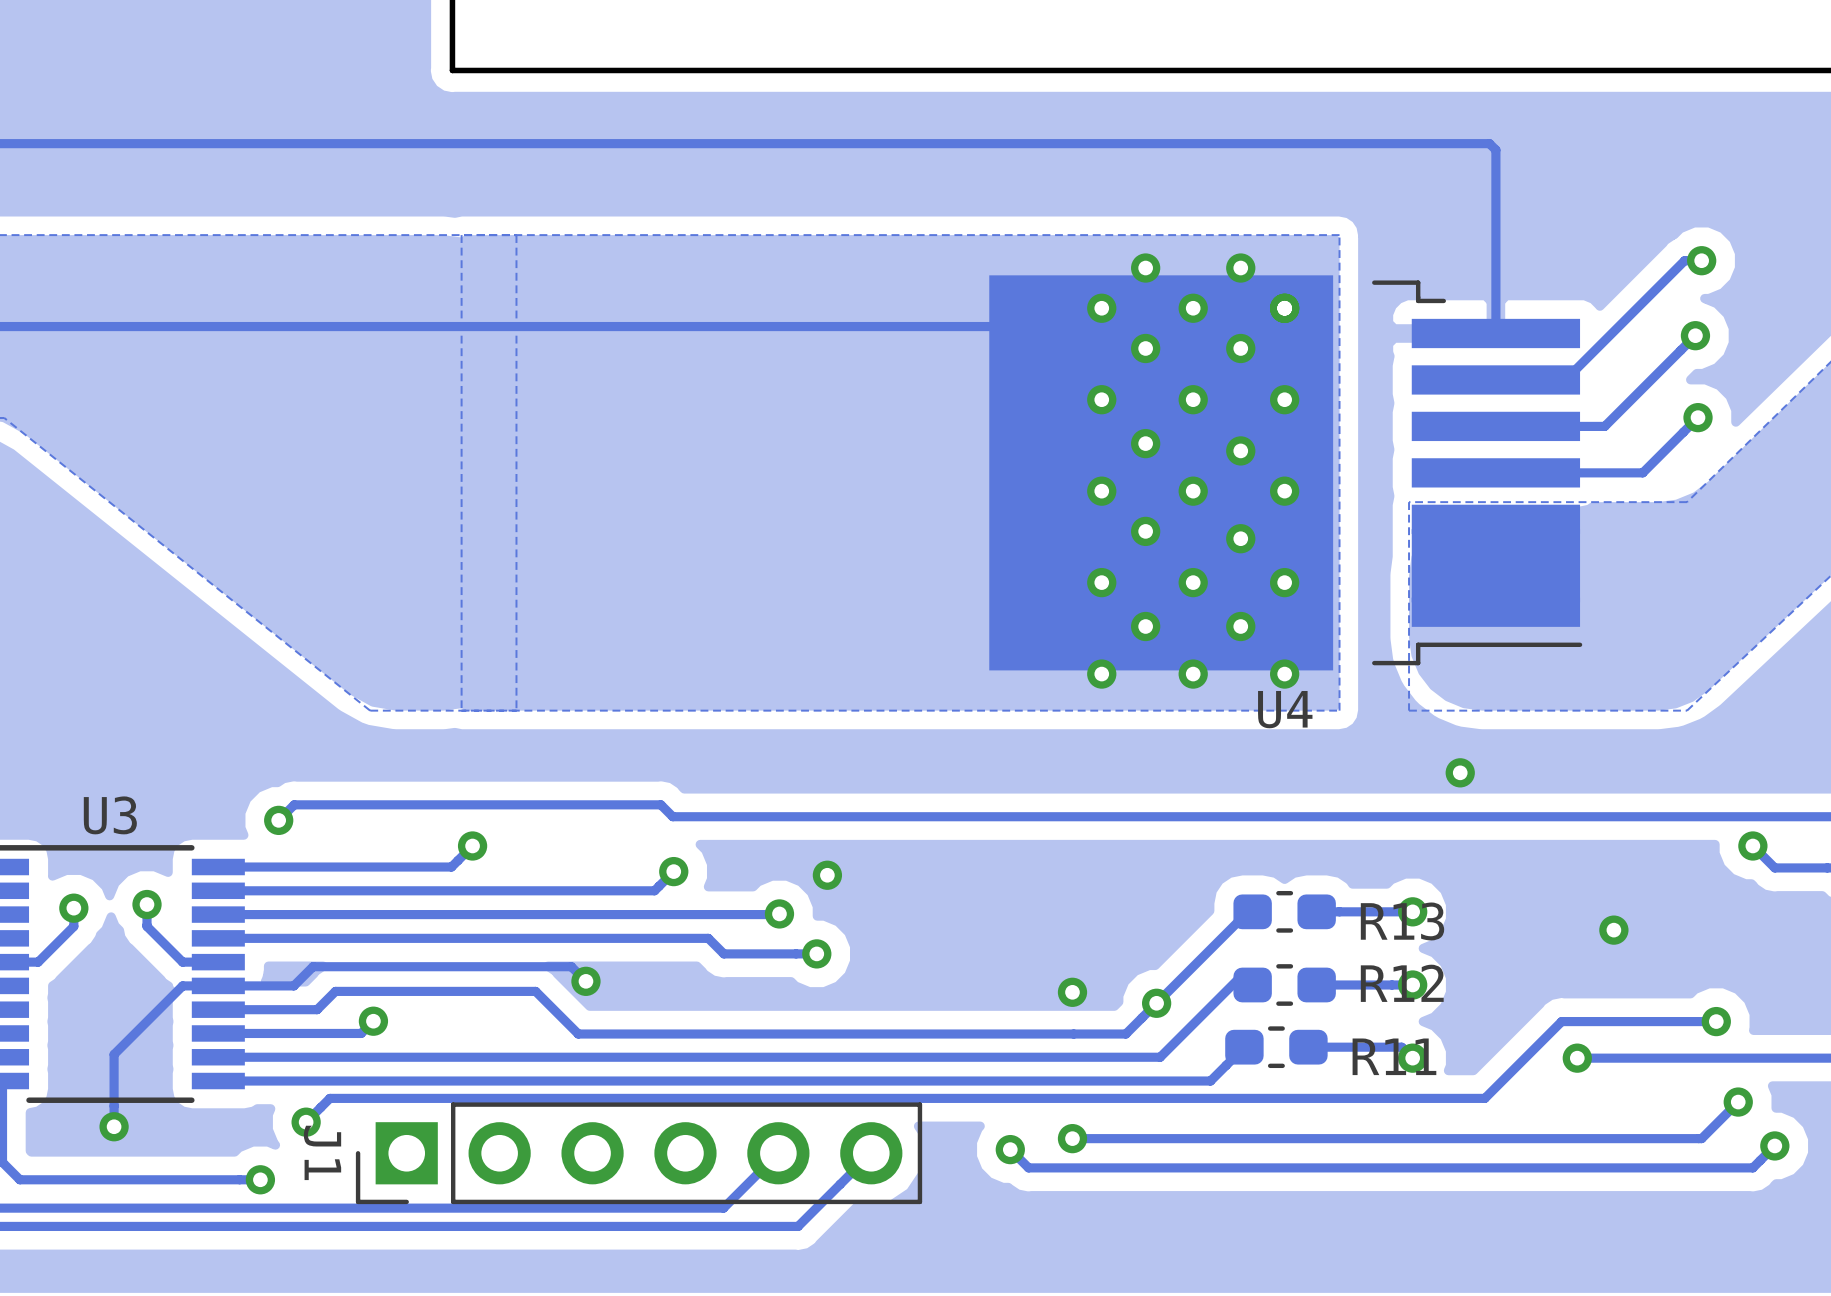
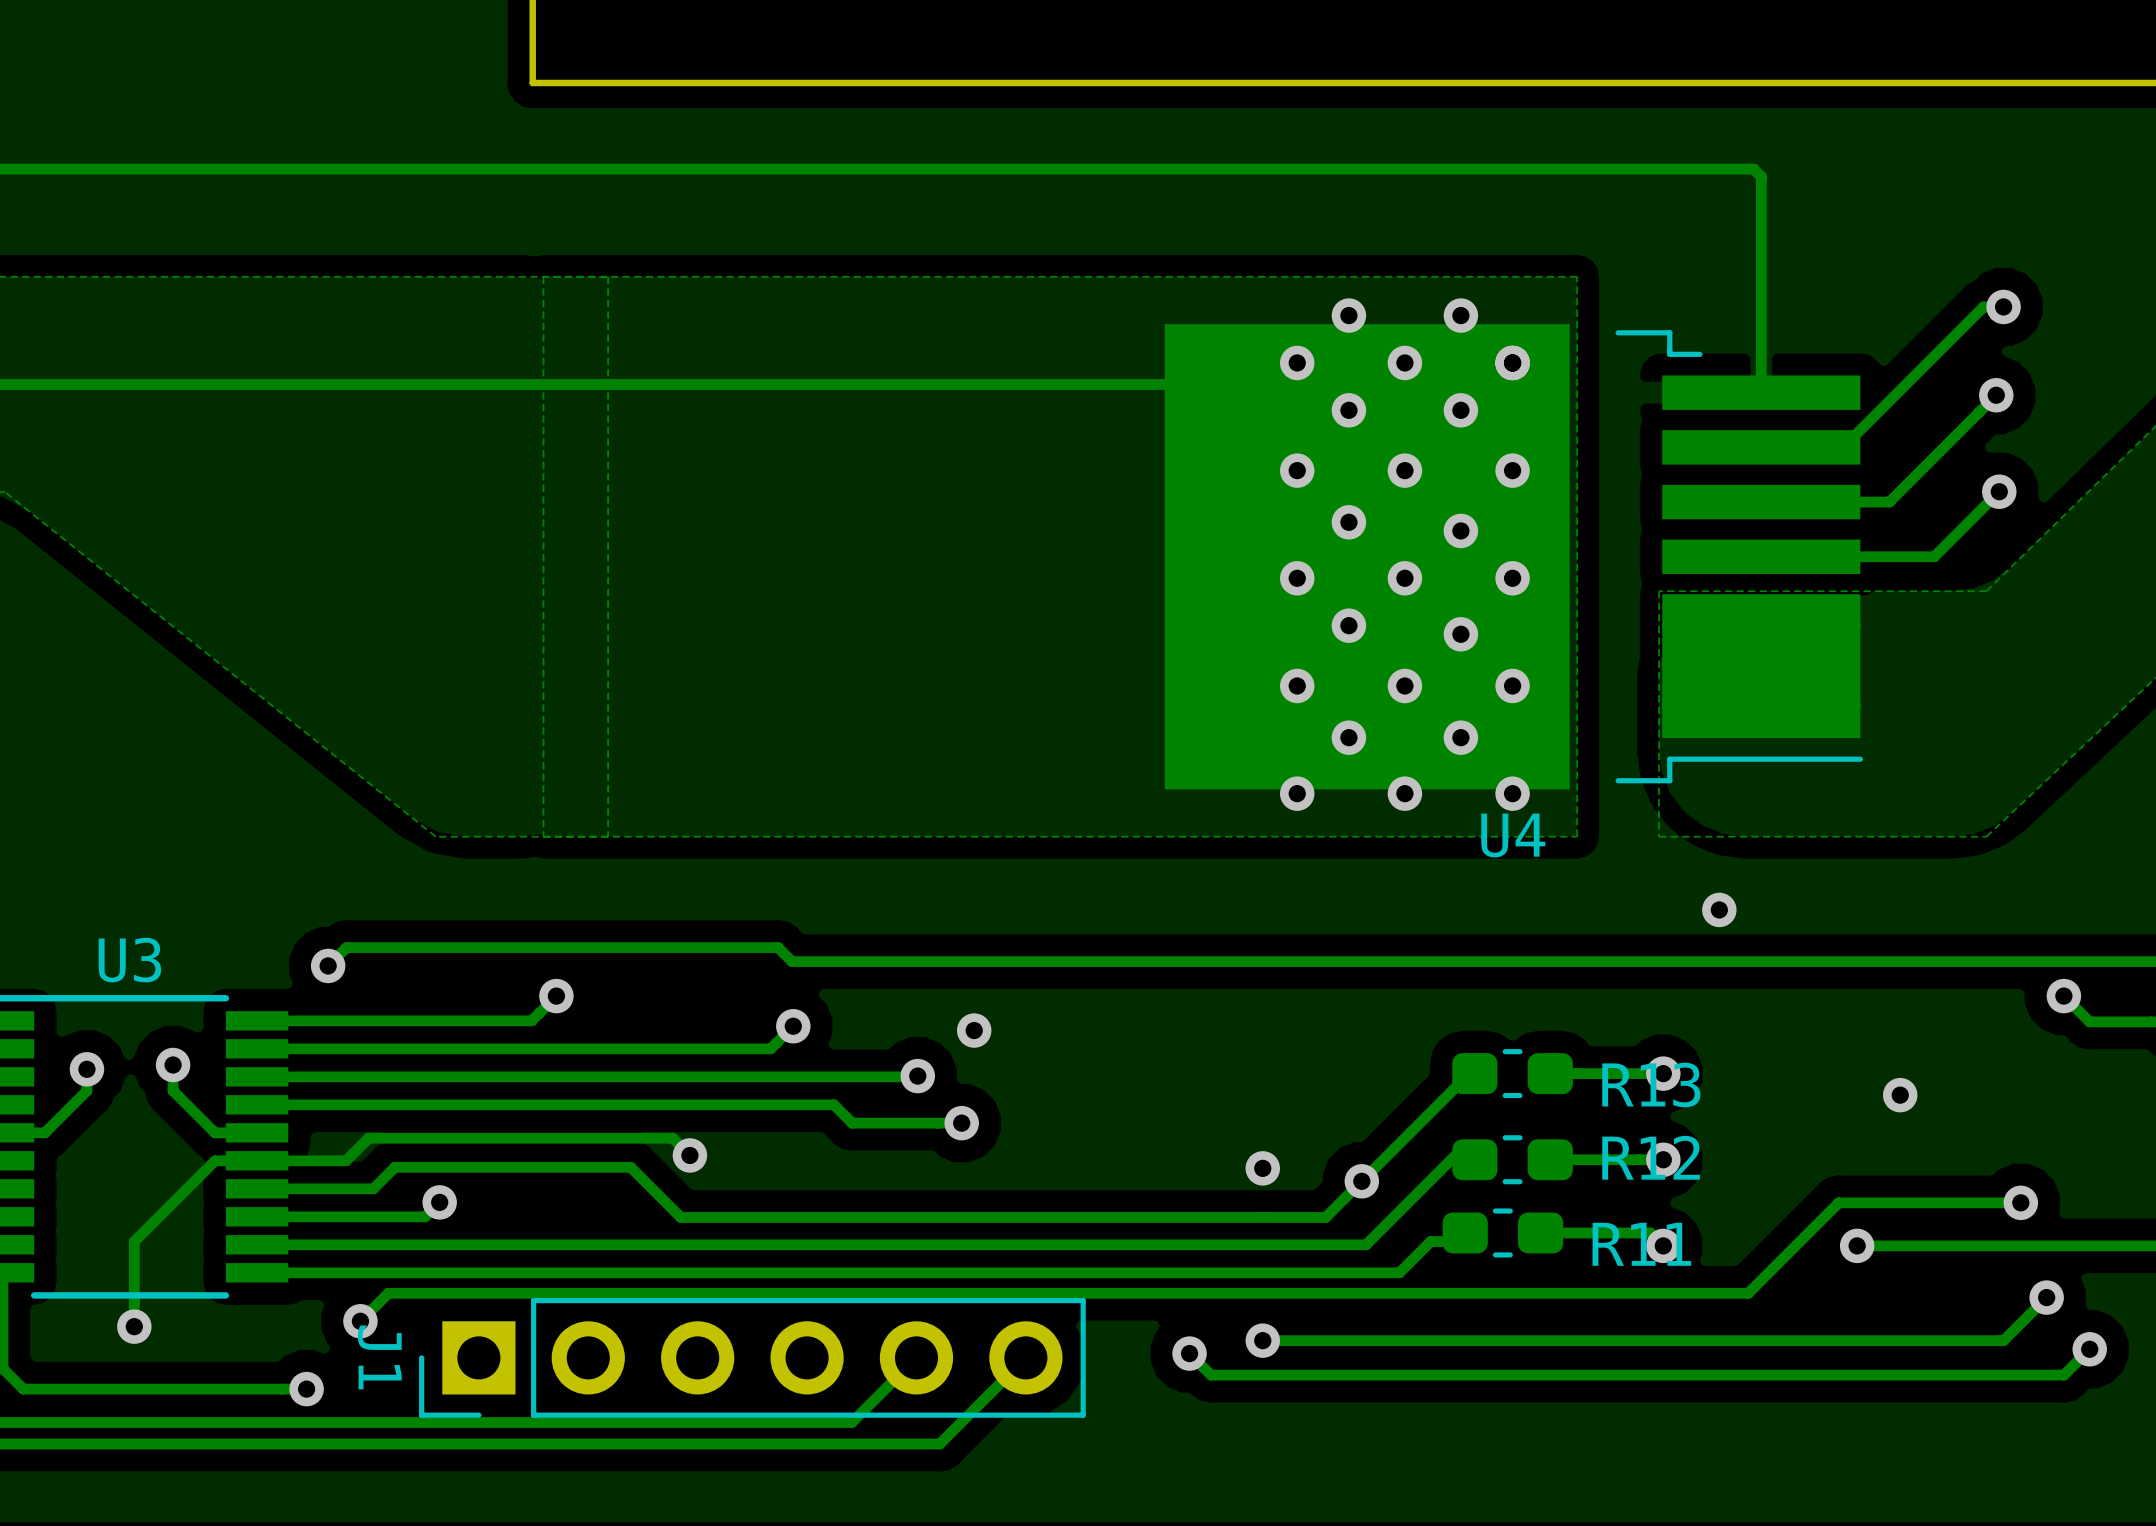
track: (1237, 1054) (1210, 1081) (1188, 1081) -> (1456, 1241) (1430, 1241) (1399, 1272)

